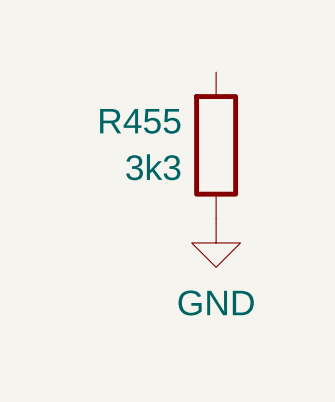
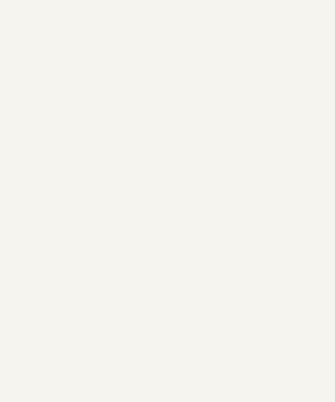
R455: 3k3 (216, 145) -> none
power symbol: GND (216, 242) -> none

